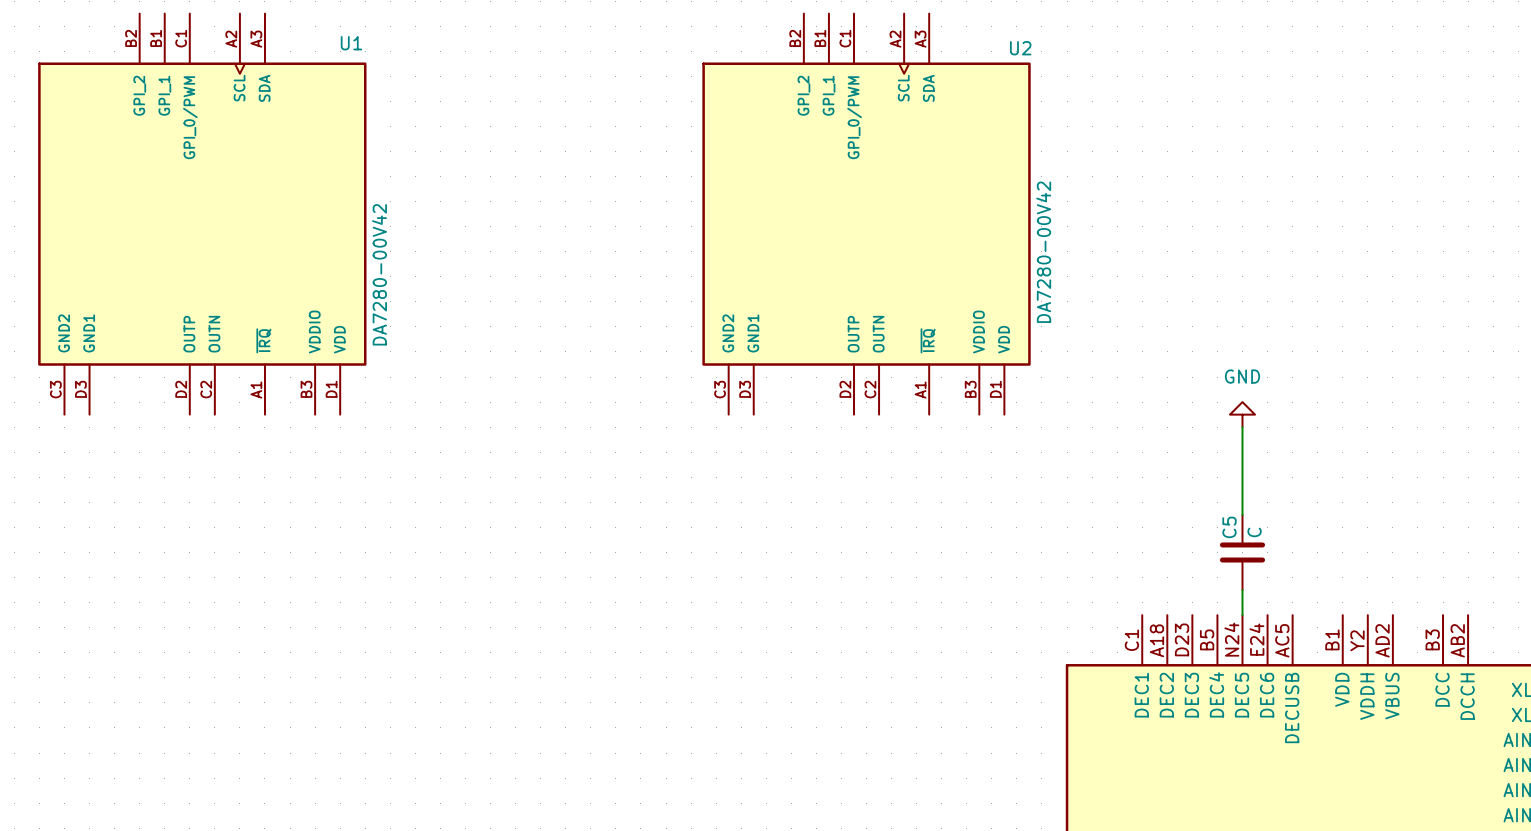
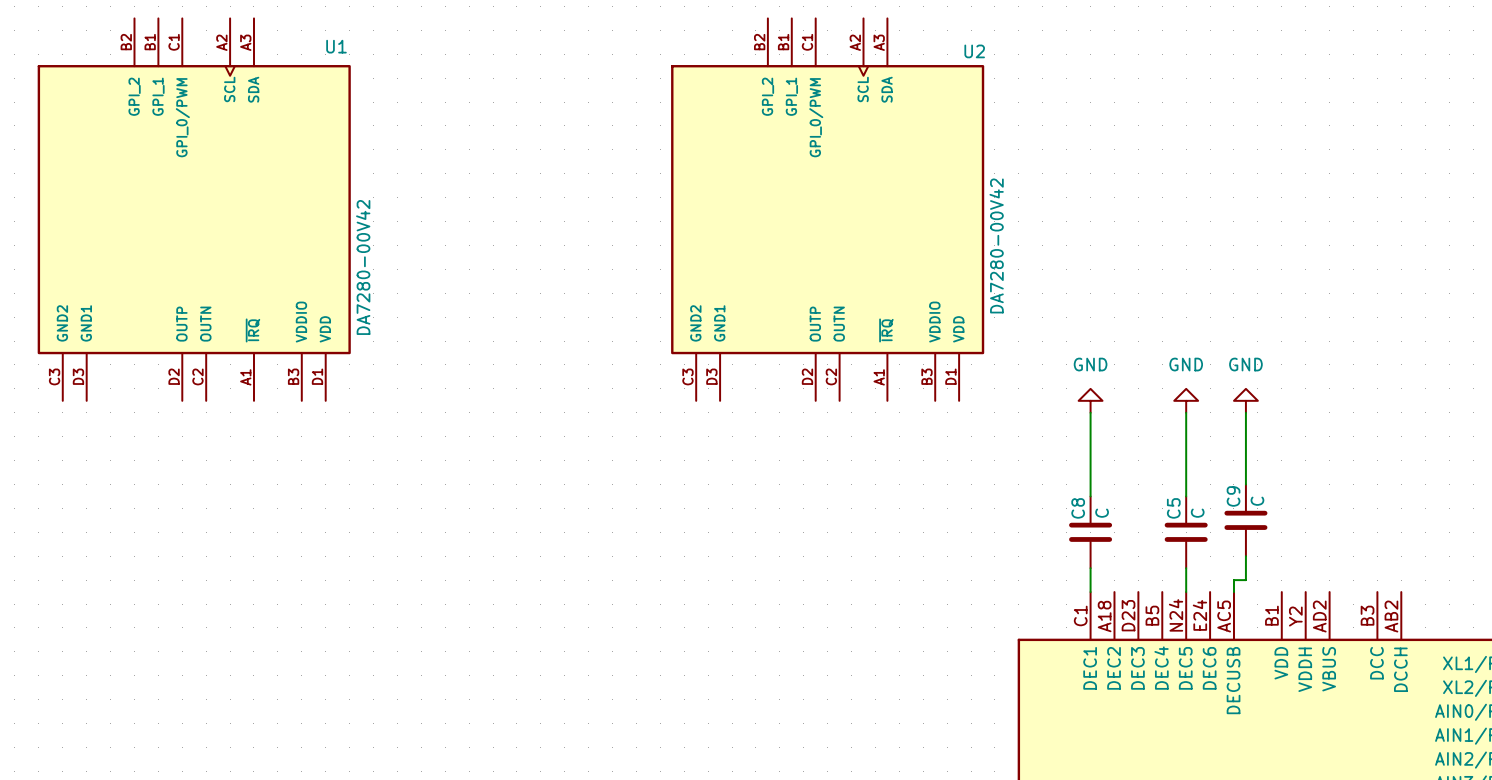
power symbol: none -> GND (1090, 400)
power symbol: none -> GND (1245, 400)
wire: none -> (1090, 412) (1090, 496)
wire: none -> (1245, 412) (1245, 484)
C9: none -> C (1245, 520)
C8: none -> C (1090, 532)
wire: none -> (1245, 556) (1245, 580) (1233, 580) (1233, 592)
wire: none -> (1090, 568) (1090, 592)

